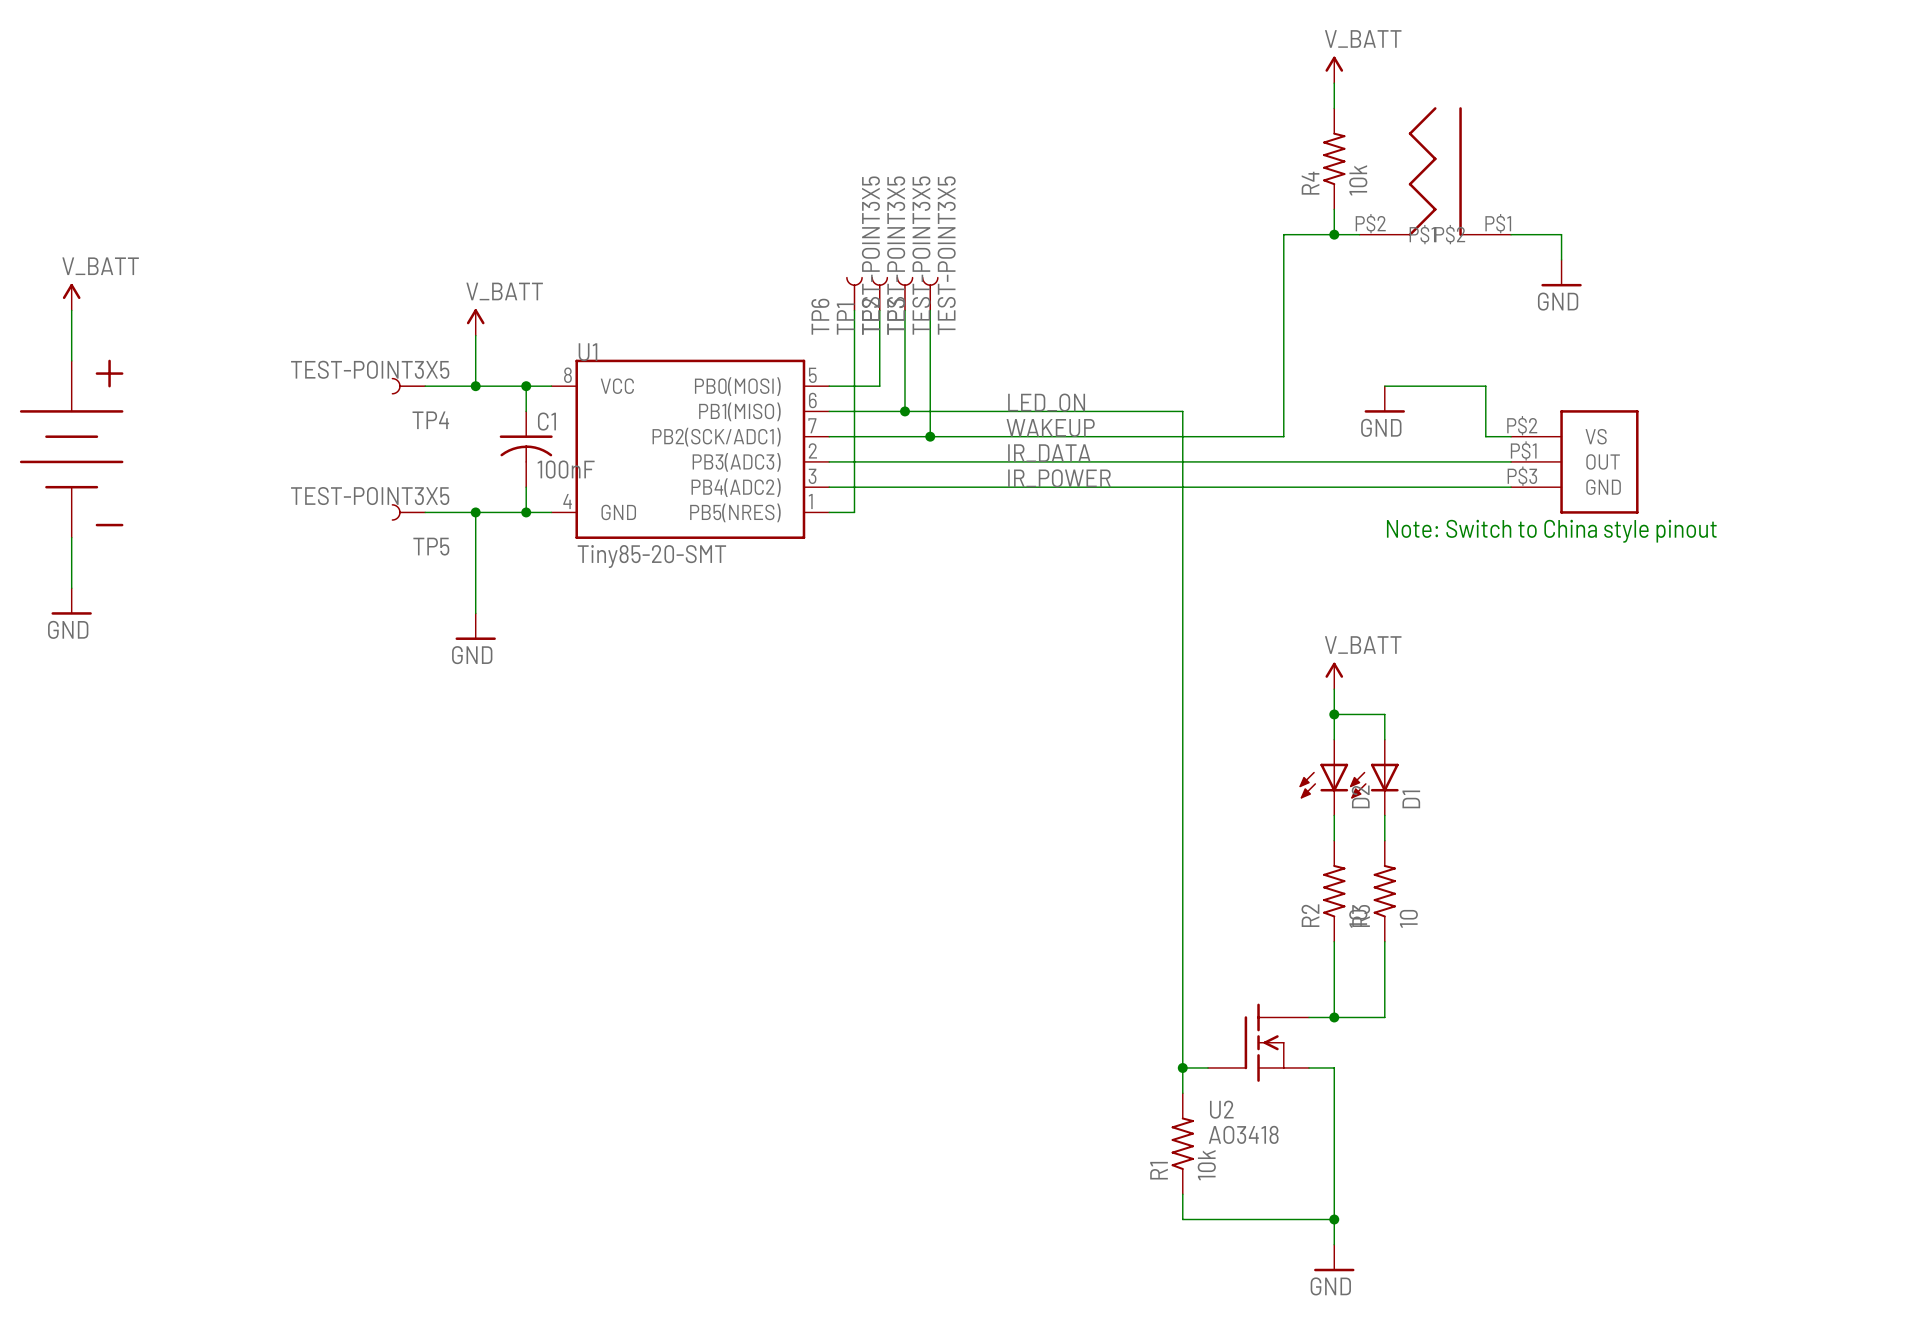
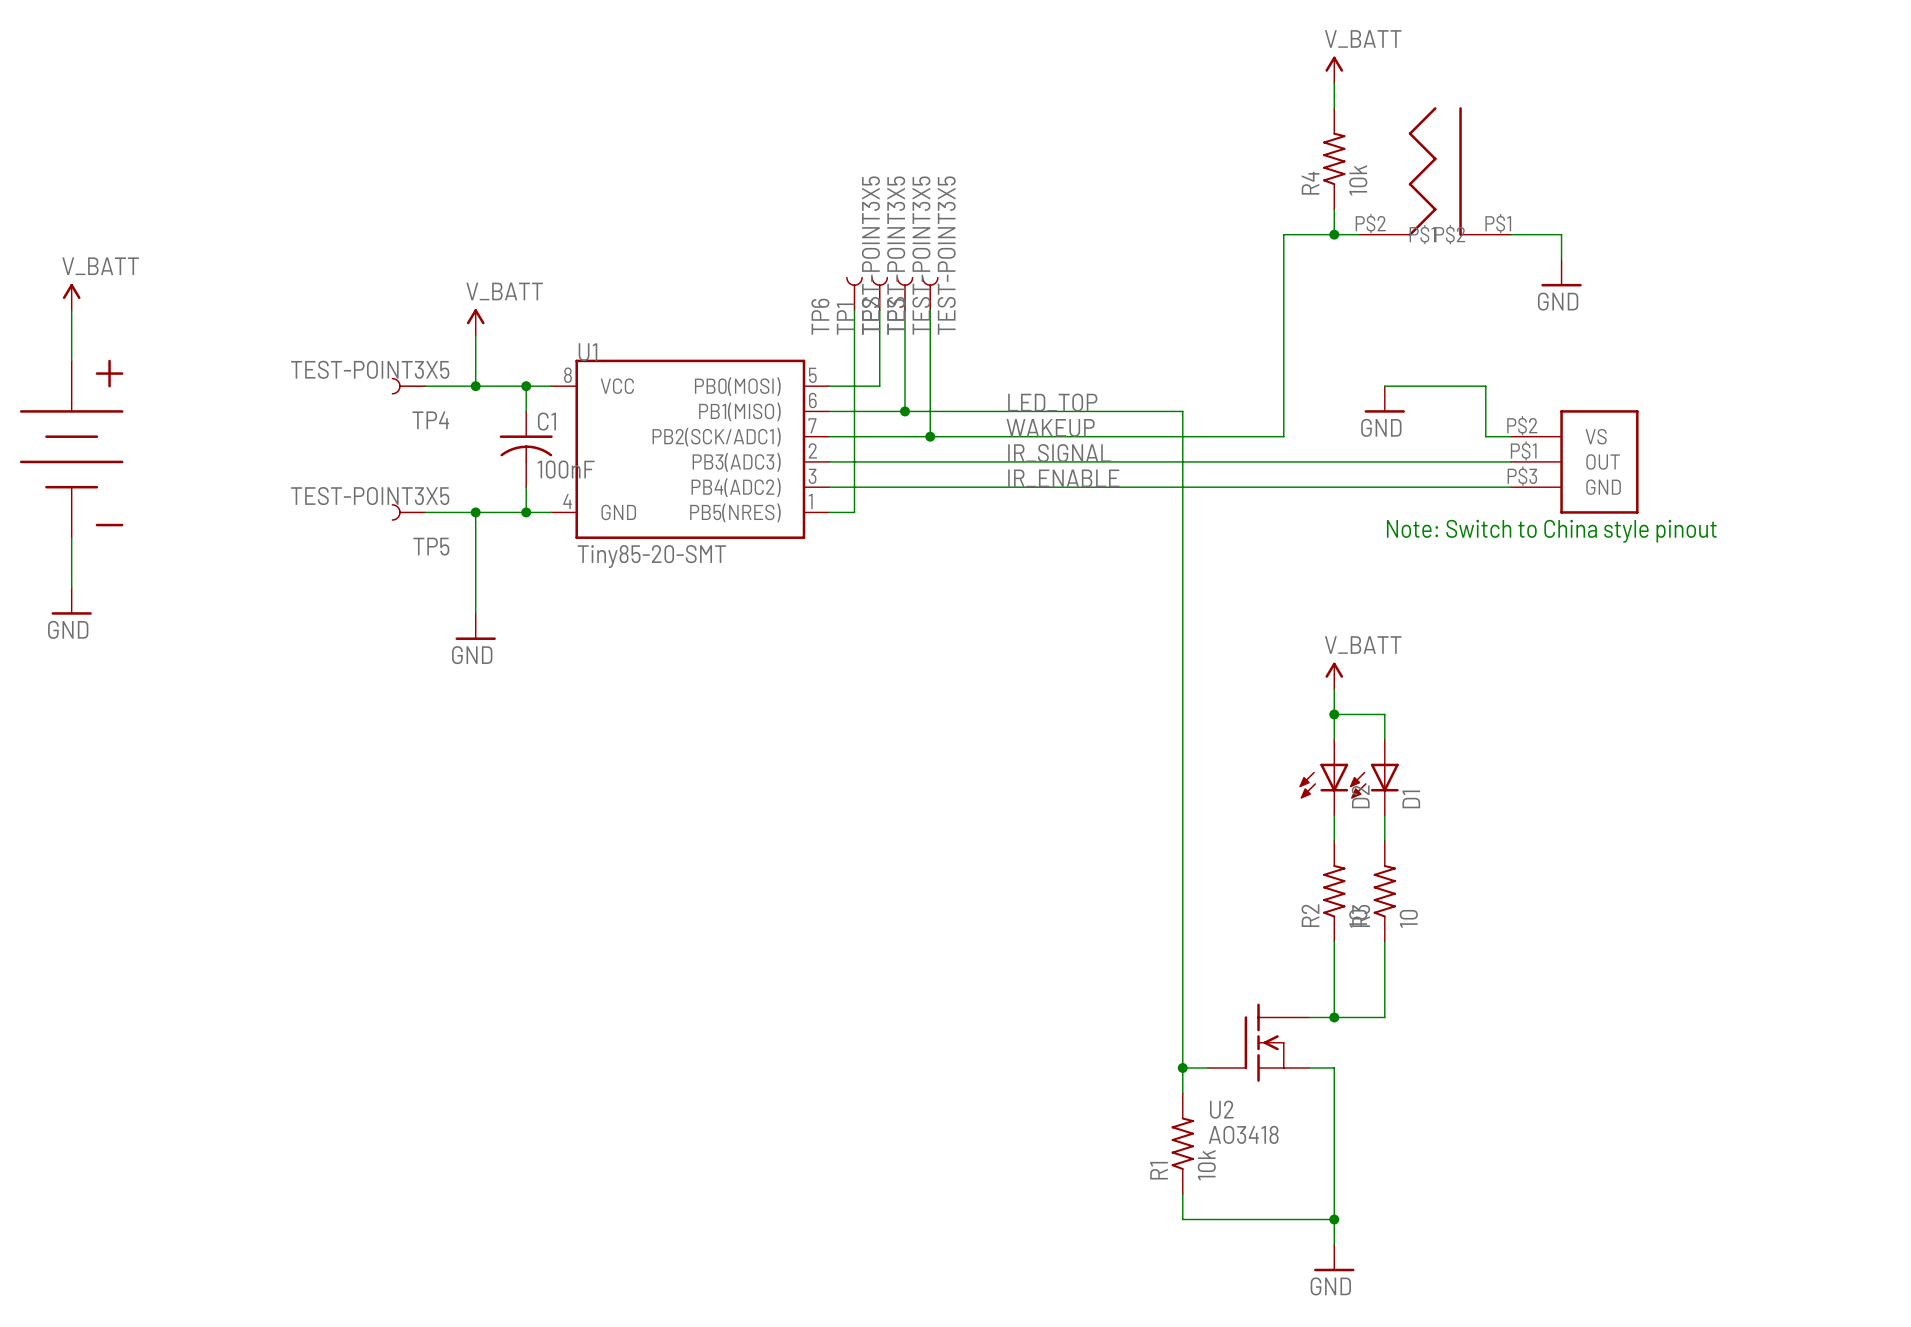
label: LED_ON (1046, 402) -> LED_TOP (1052, 402)
label: IR_DATA (1049, 453) -> IR_SIGNAL (1059, 453)
label: IR_POWER (1059, 478) -> IR_ENABLE (1063, 478)

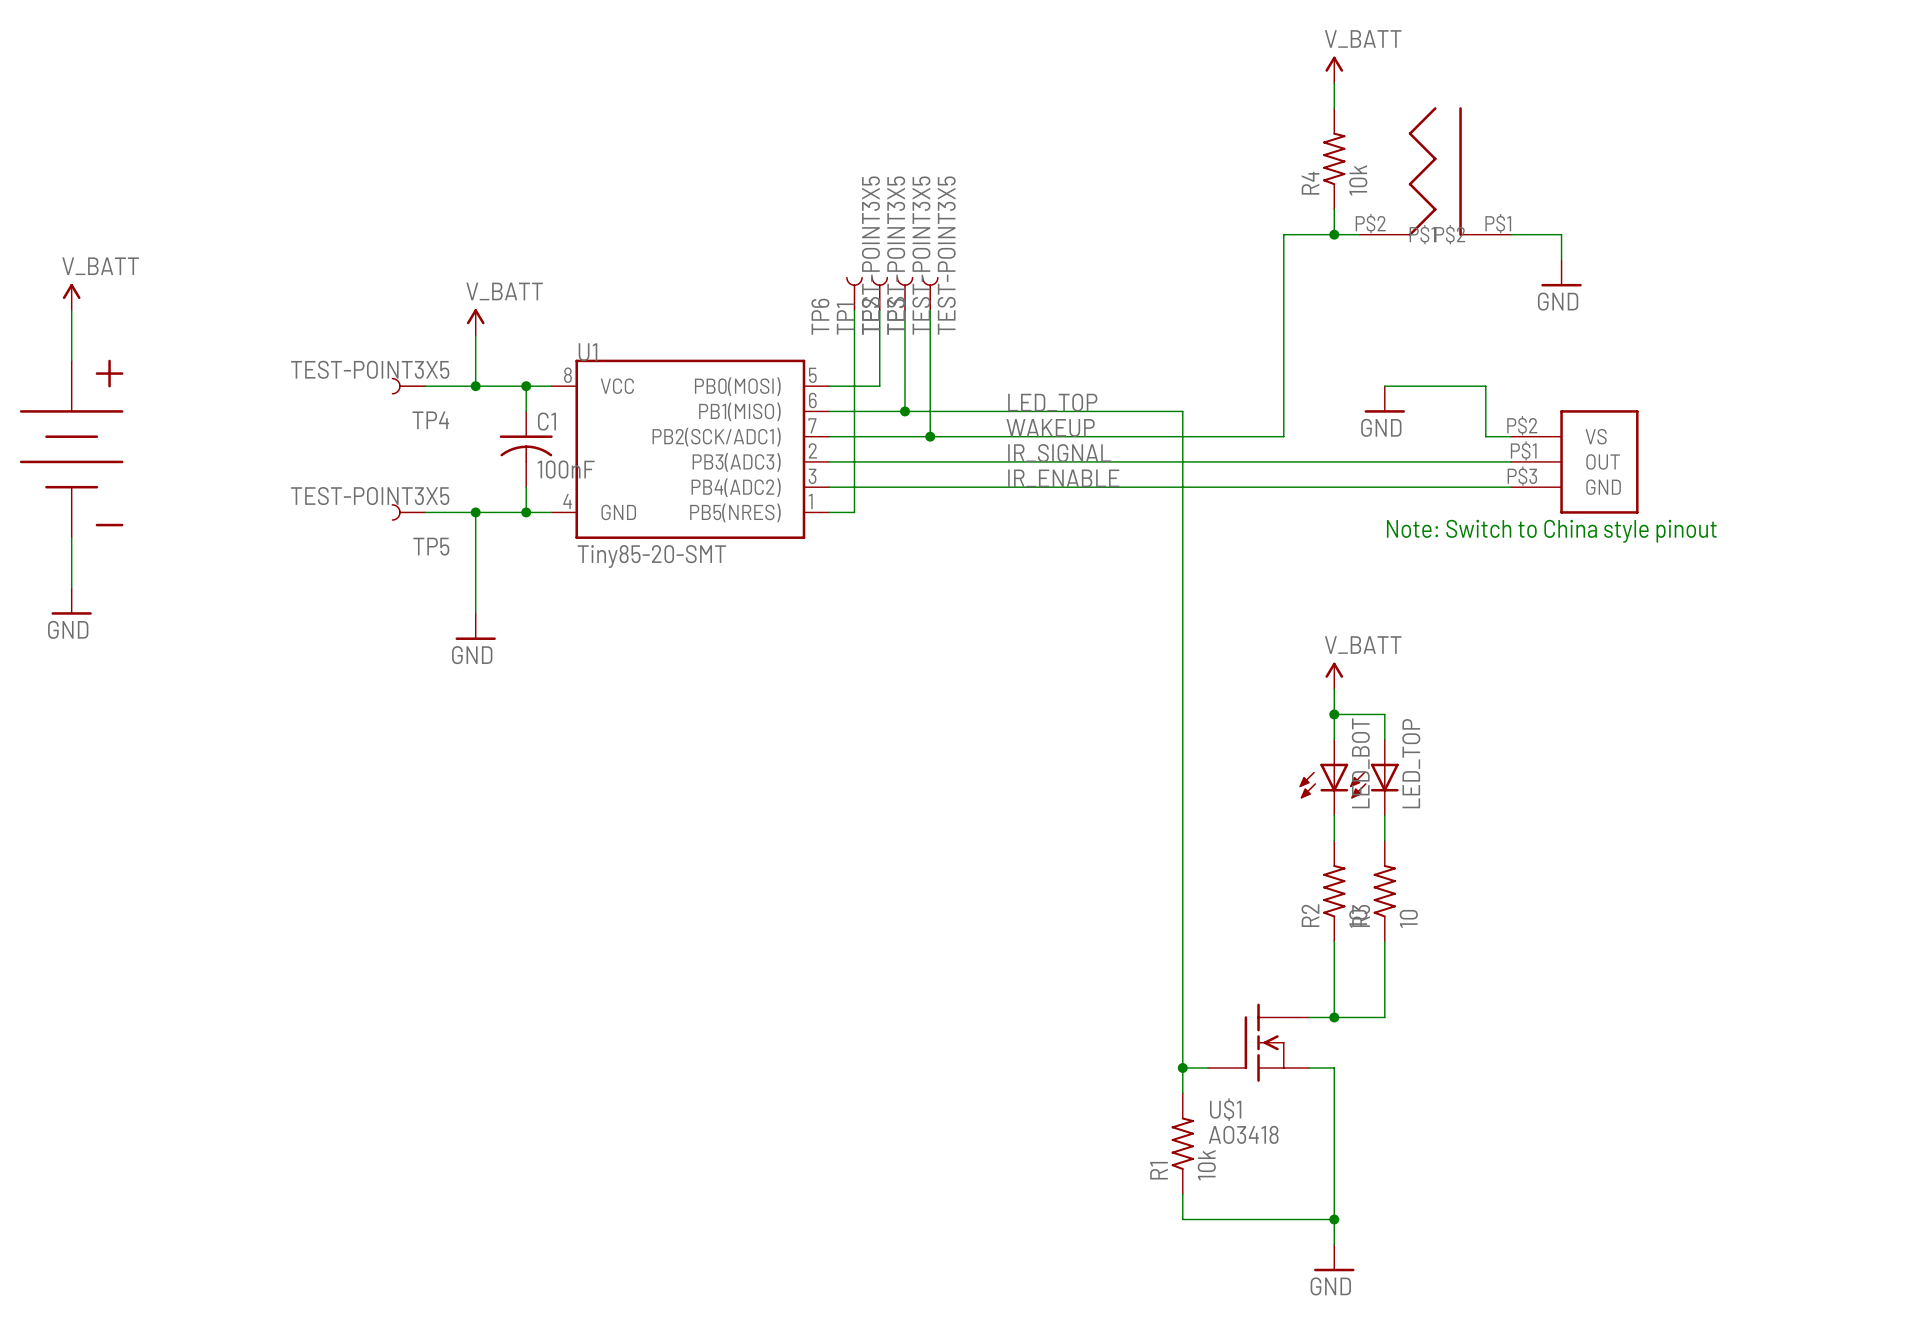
D2 name: D2 (1360, 796) -> LED_BOT (1360, 763)
D1 name: D1 (1411, 799) -> LED_TOP (1411, 763)
U2 name: U2 (1221, 1109) -> U$1 (1225, 1109)

